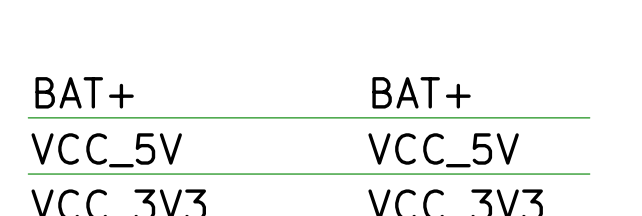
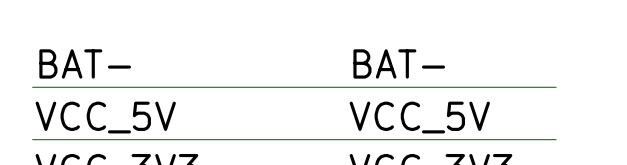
label: BAT+ (84, 92) -> BAT- (85, 63)
label: BAT+ (421, 92) -> BAT- (399, 63)

